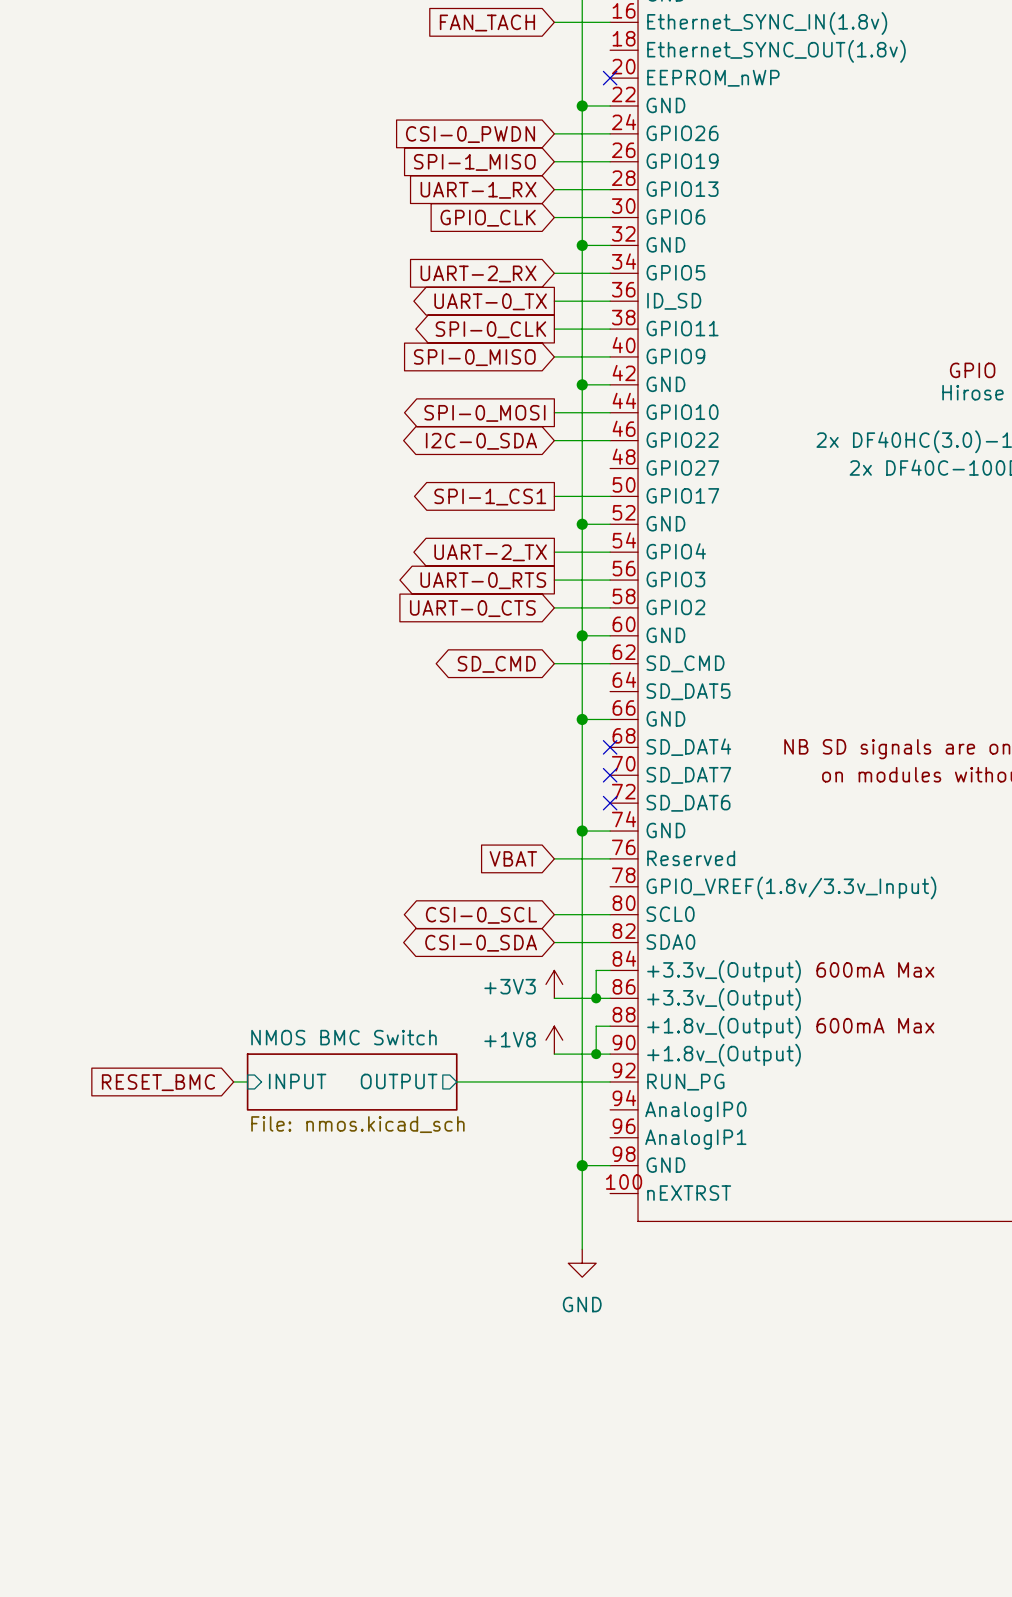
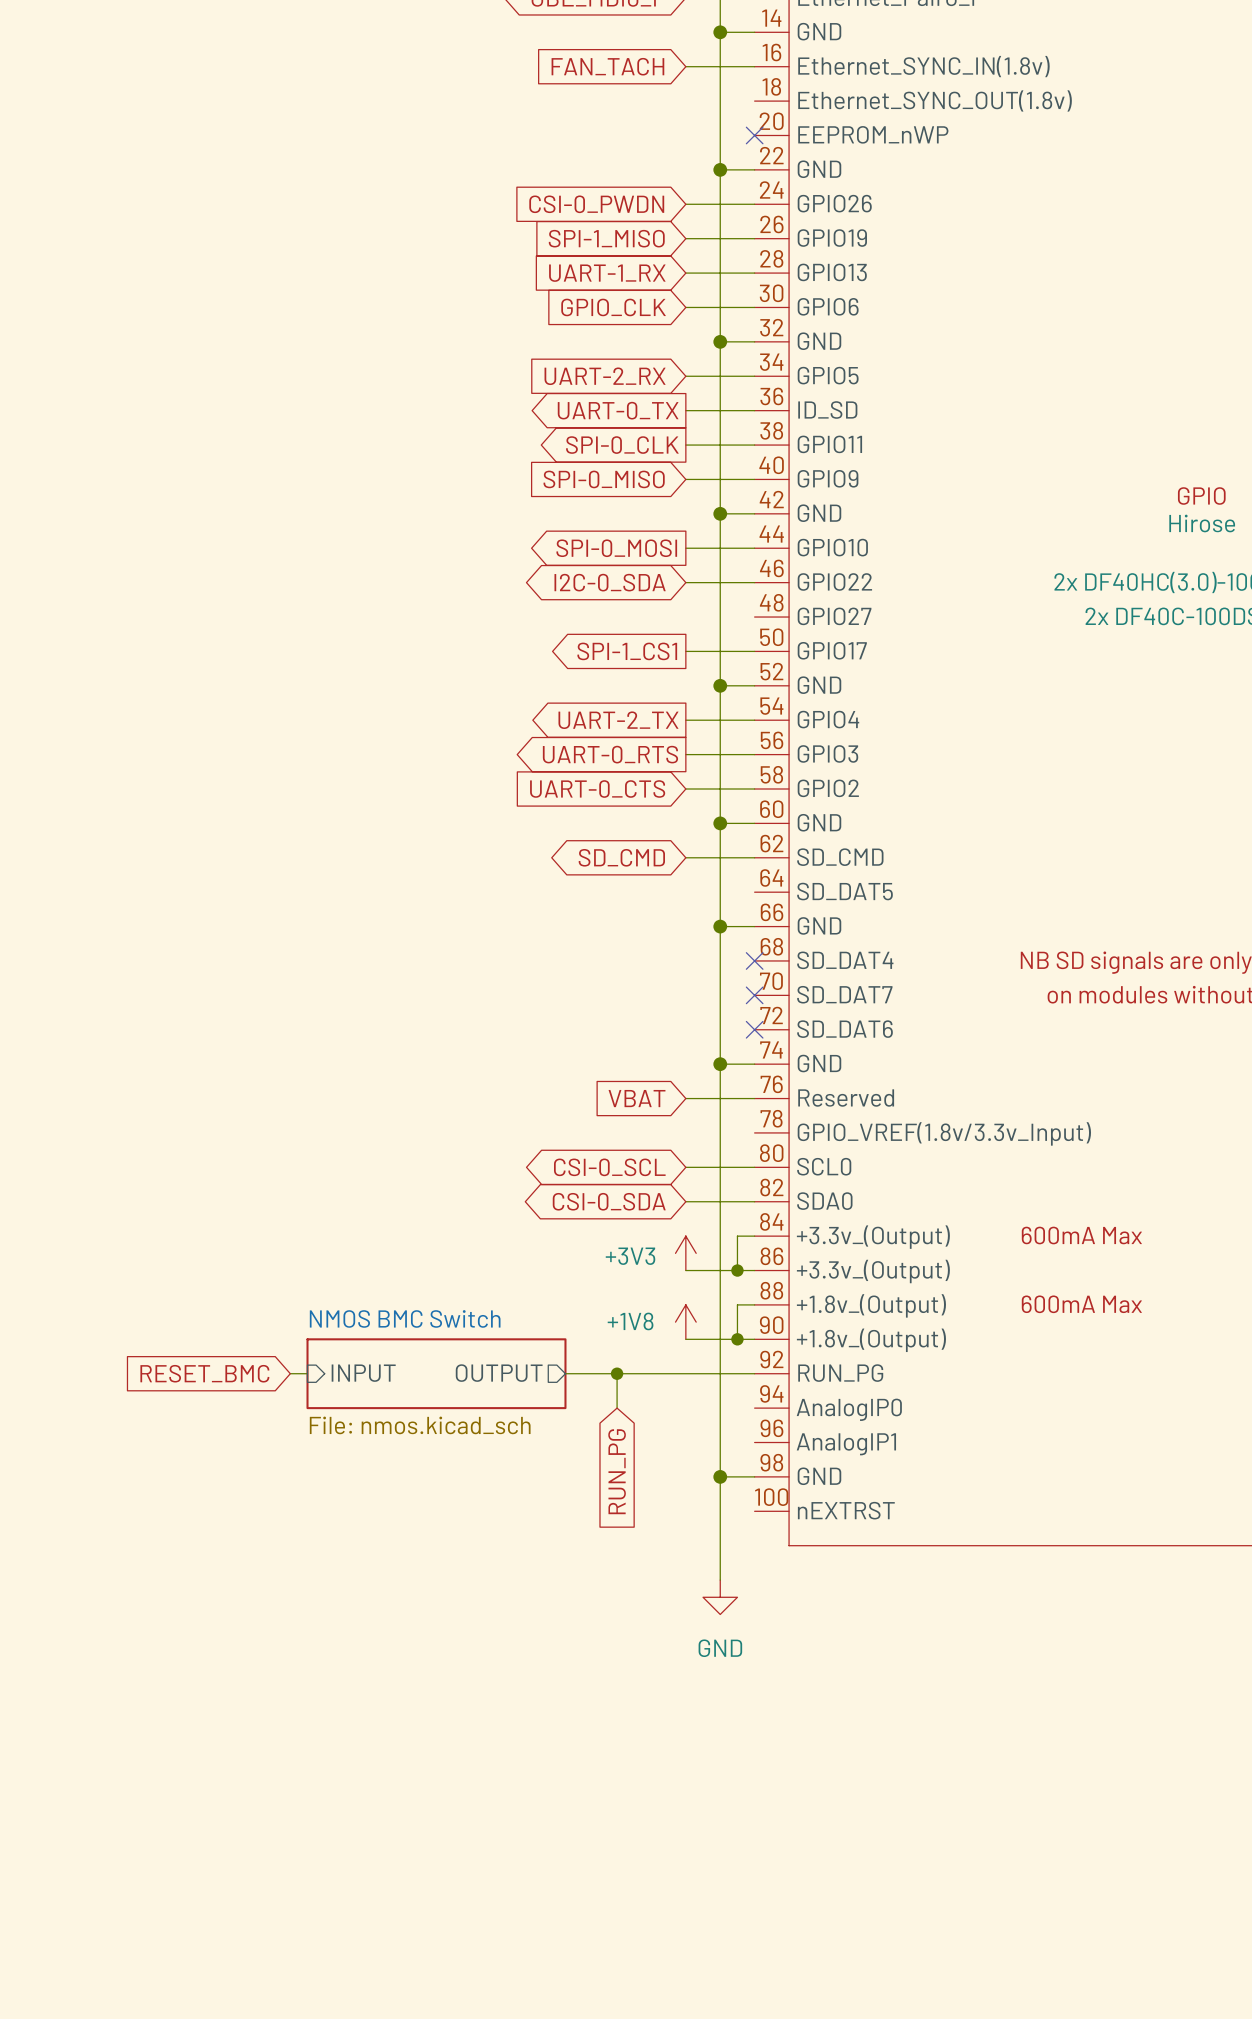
wire: none -> (617, 1373) (617, 1408)
junction: none -> (617, 1373)
global label: none -> RUN_PG (617, 1471)

